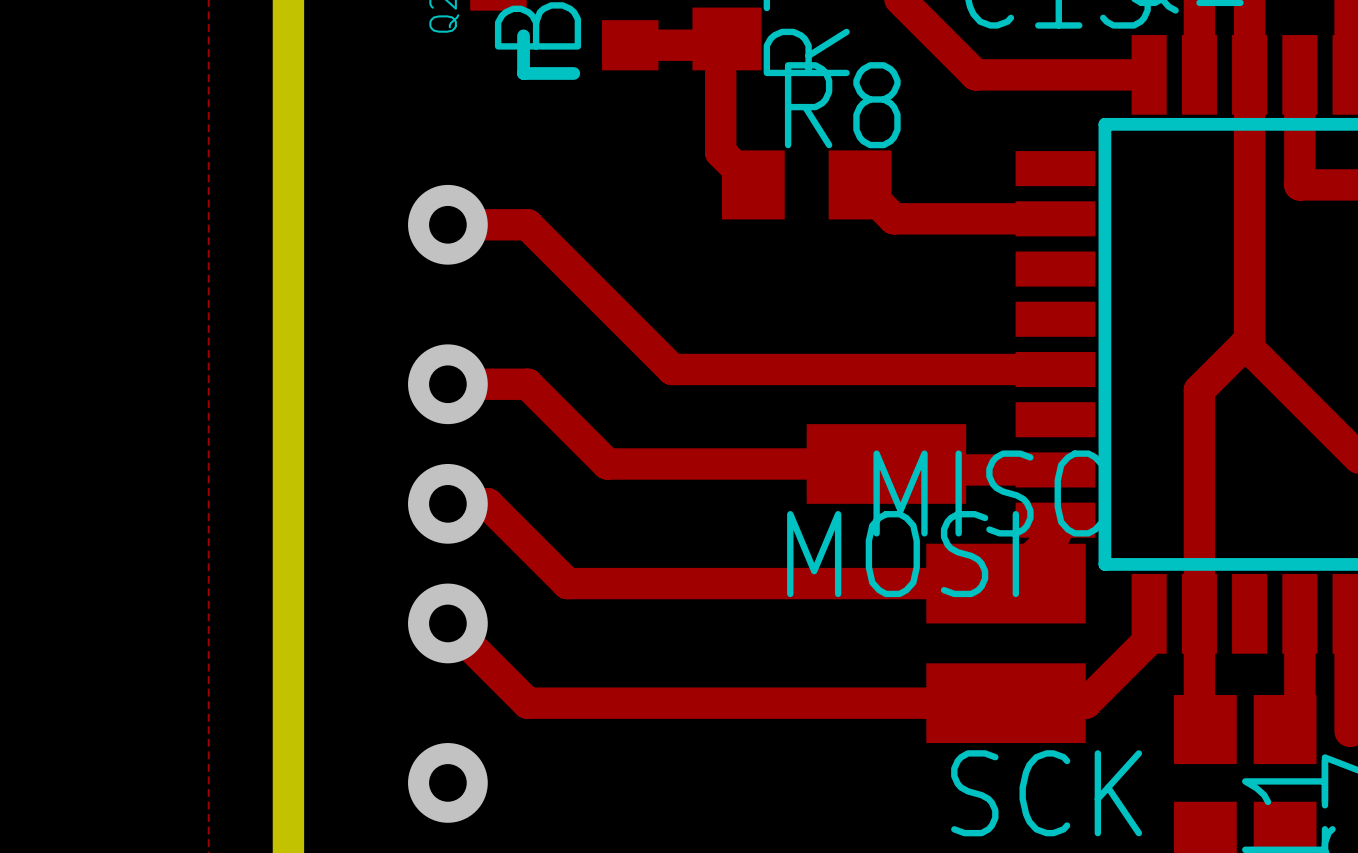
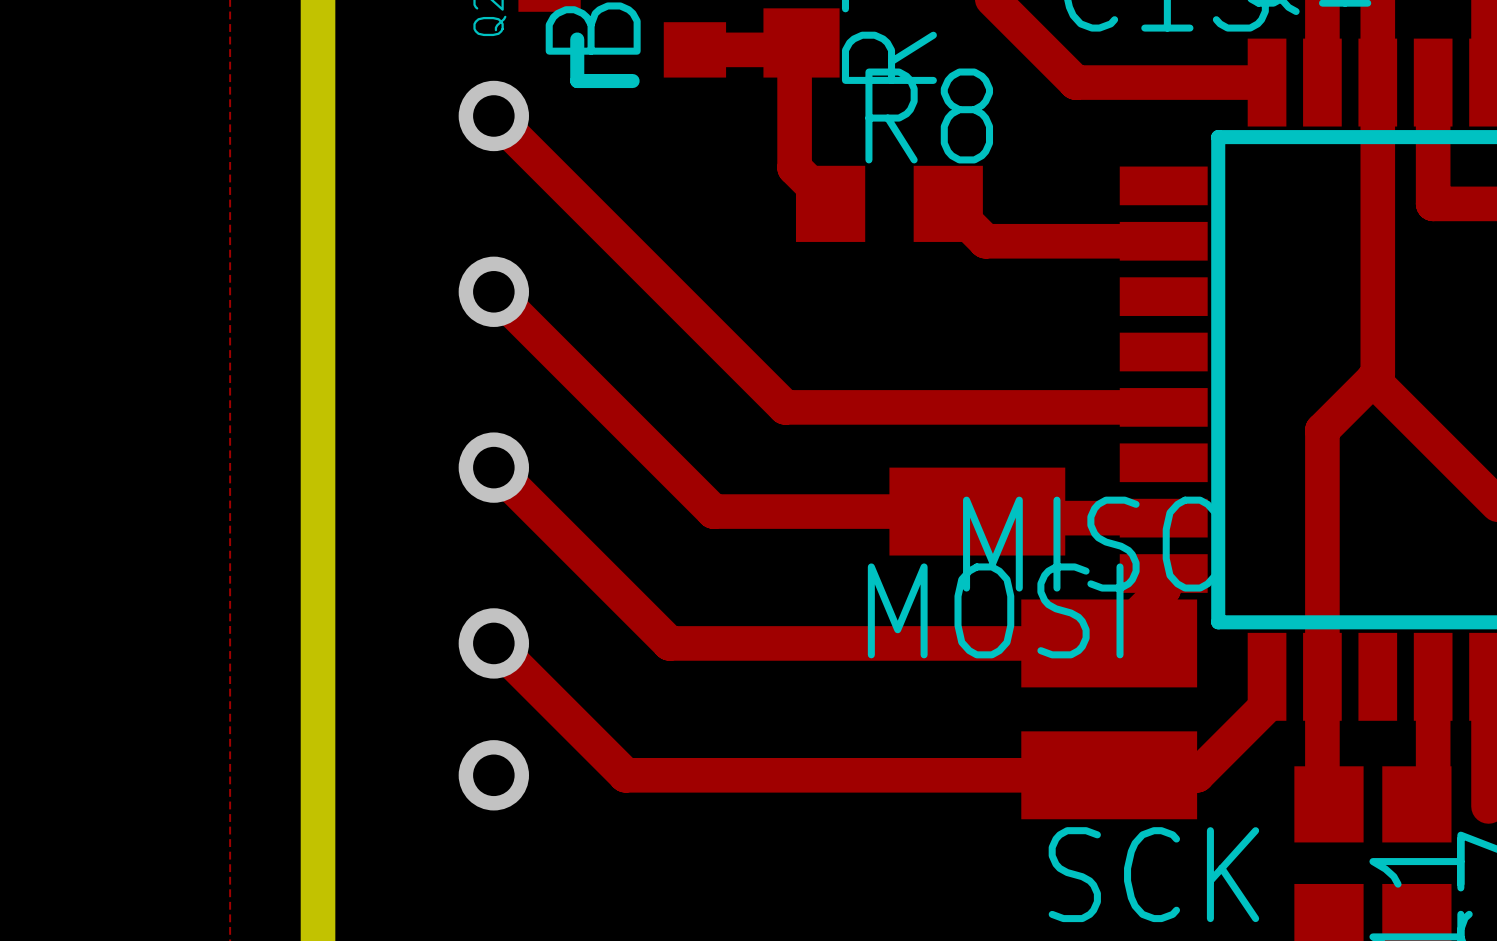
via: none -> (493, 115)
track: (447, 224) (527, 224) (672, 369) (712, 369) -> (493, 115) (785, 407)
via position: (447, 224) -> (493, 291)
track: (447, 384) (527, 384) (607, 463) (647, 463) -> (493, 291) (713, 511)
via position: (447, 384) -> (493, 467)
track: (447, 503) (487, 503) (567, 583) (607, 583) -> (493, 467) (669, 643)
via: (447, 503) -> none
track: (447, 623) (527, 703) (567, 703) -> (493, 643) (625, 775)
via position: (447, 623) -> (493, 643)
via: none -> (493, 775)
via: (447, 782) -> none

